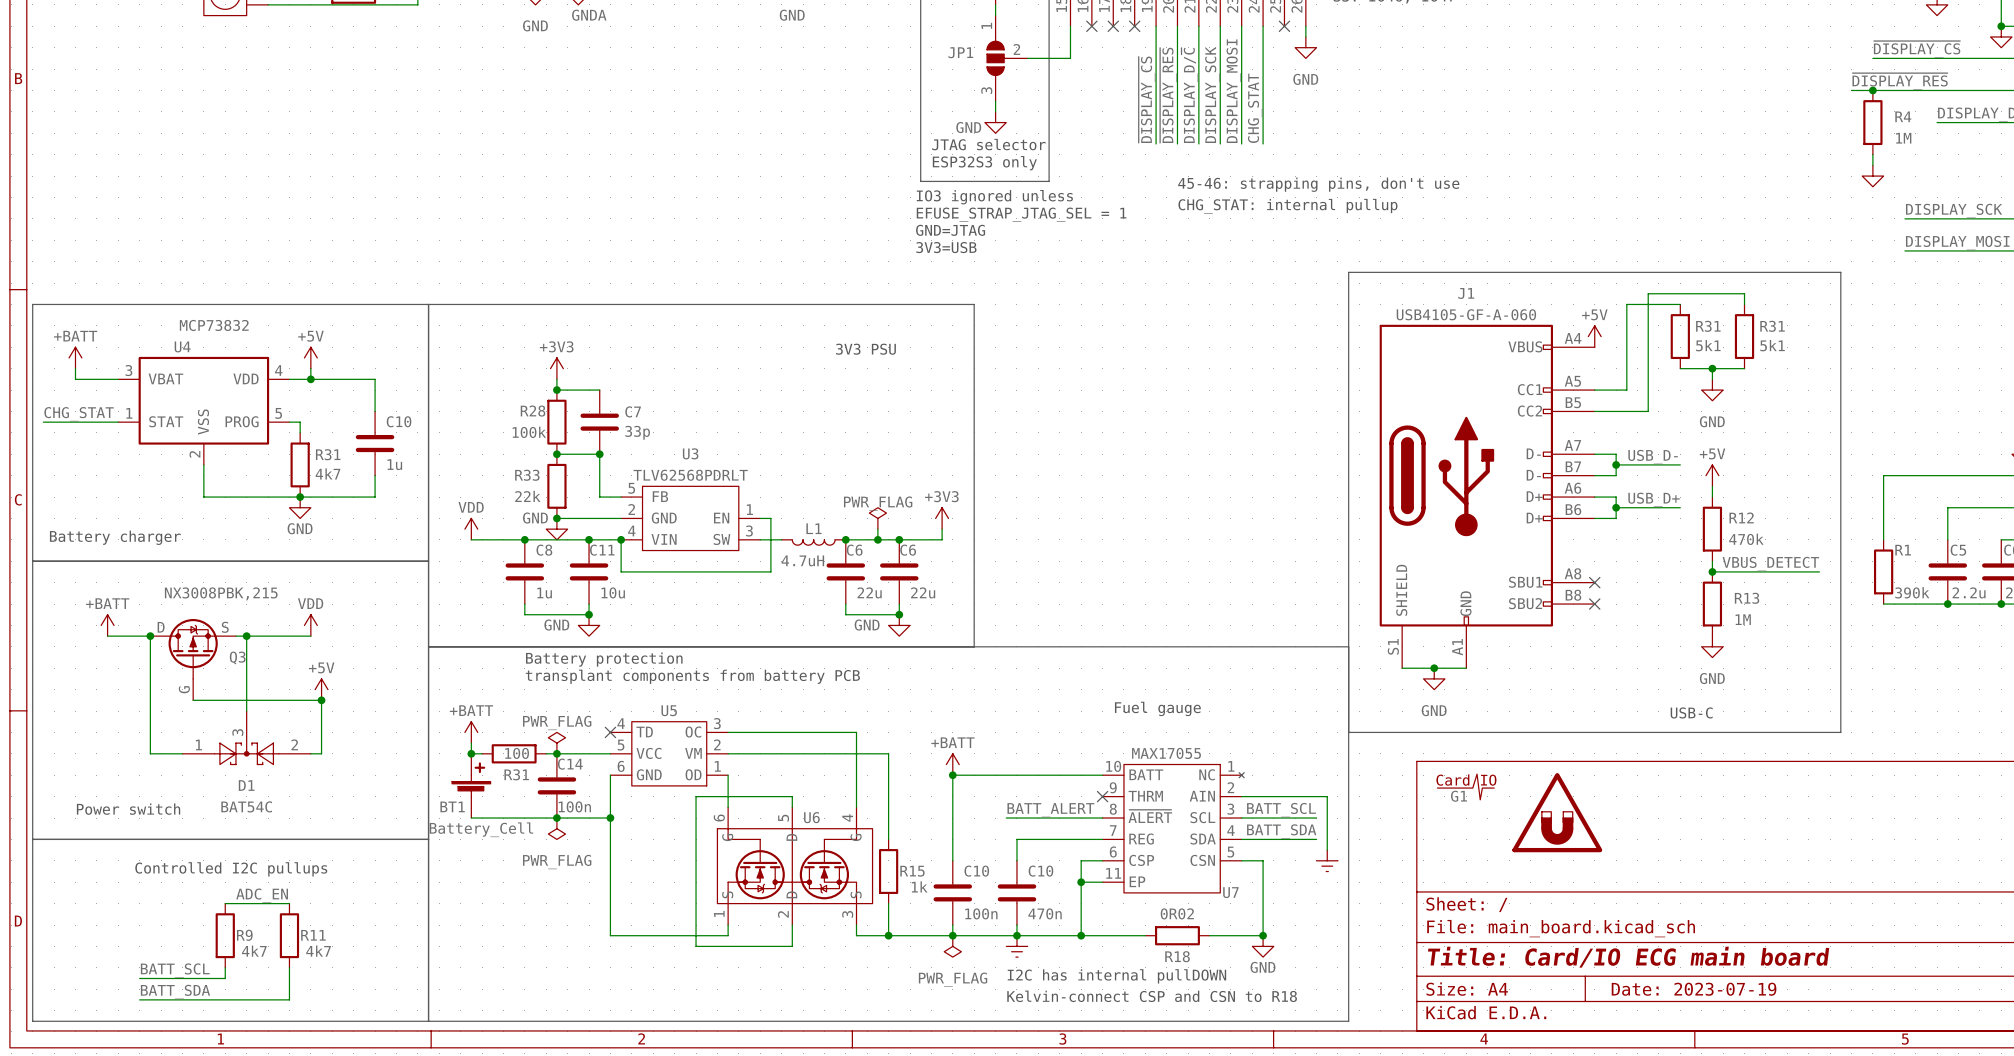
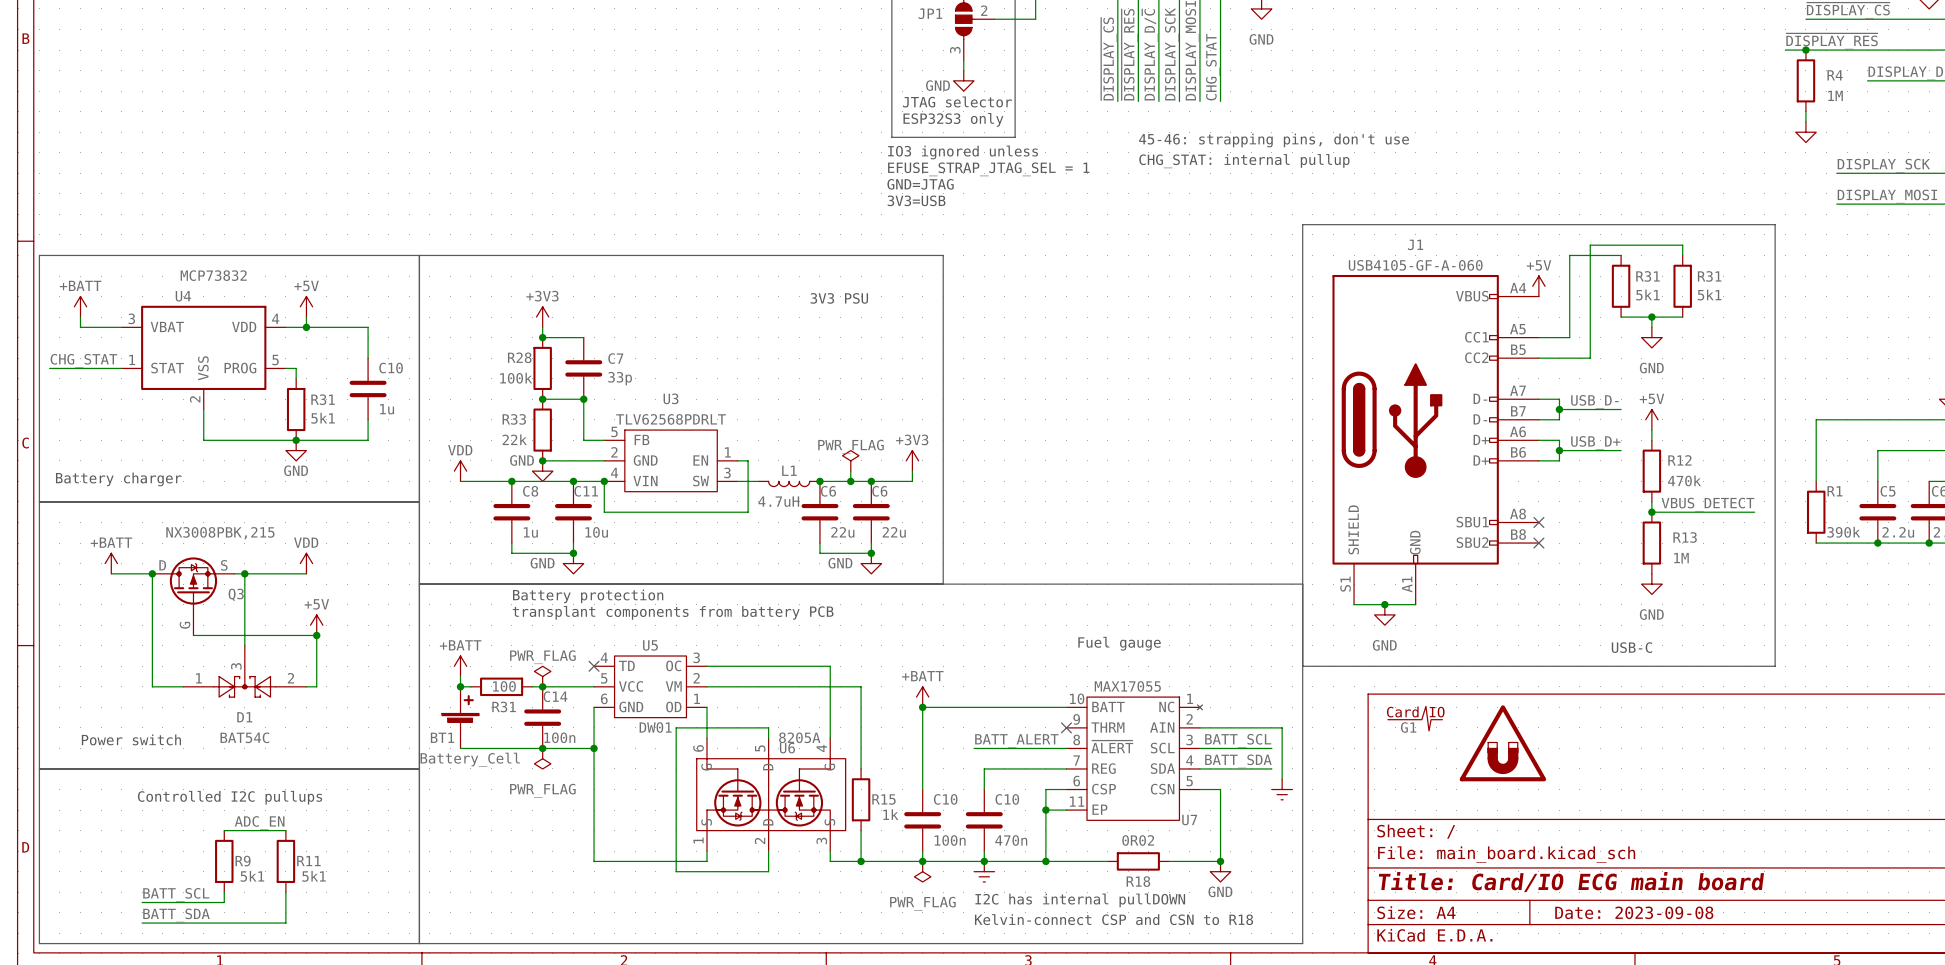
R31 value: 4k7 (327, 473) -> 5k1 (323, 418)
U5 value: none -> DW01 (655, 727)
U6 value: none -> 8205A (799, 737)
R9 value: 4k7 (254, 951) -> 5k1 (252, 876)
R11 value: 4k7 (318, 951) -> 5k1 (314, 876)
title block: Date: 2023-07-19 (1694, 989) -> Date: 2023-09-08 (1634, 912)

